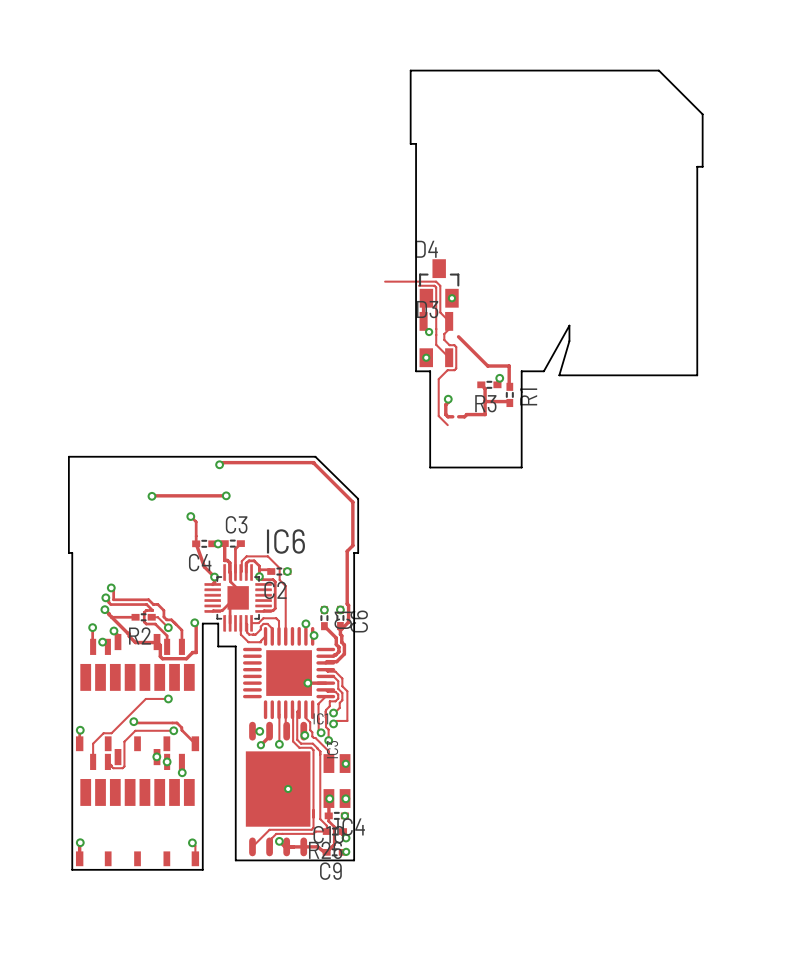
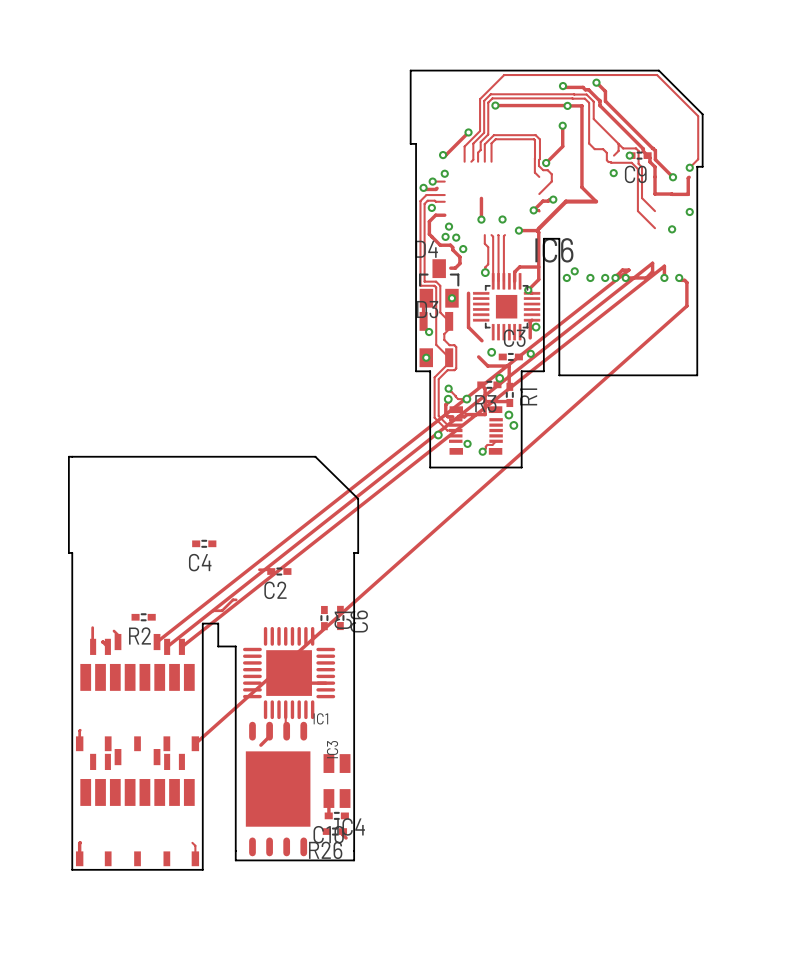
track: none -> (596, 82) (605, 91) (605, 101) (655, 150) (655, 159) (673, 177)
via: none -> (596, 82)
track: none -> (563, 86) (583, 87) (588, 89) (599, 101)
via: none -> (563, 86)
track: none -> (599, 100) (599, 105) (649, 157) (649, 161) (655, 166) (655, 194) (688, 194) (689, 177)
track: none -> (495, 105) (581, 105) (581, 187) (596, 201) (565, 201) (536, 230)
via: none -> (495, 105)
via: none -> (567, 105)
track: none -> (562, 125) (562, 146) (546, 163)
via: none -> (562, 125)
track: none -> (468, 132) (445, 155) (443, 155)
via: none -> (468, 132)
track: none -> (618, 143) (618, 151) (613, 155)
via: none -> (443, 155)
via: none -> (629, 155)
track: none -> (534, 158) (533, 139) (495, 139) (491, 143) (491, 161)
track: none -> (534, 158) (534, 172) (539, 176)
track: none -> (464, 161) (464, 146) (480, 131) (480, 99) (504, 75) (657, 75) (698, 116) (698, 159) (689, 167)
track: none -> (471, 161) (473, 159) (473, 143) (484, 132) (484, 100) (490, 94) (586, 94) (593, 101) (593, 119) (623, 148) (636, 148) (638, 150) (638, 163) (642, 167) (642, 198) (655, 211)
track: none -> (478, 161) (480, 142) (488, 134) (488, 102) (492, 98) (584, 98) (589, 102) (589, 143) (594, 149) (603, 149) (606, 152) (608, 162) (631, 162) (637, 169) (637, 211) (655, 228)
track: none -> (484, 161) (484, 144) (493, 135) (535, 135) (539, 139) (538, 165) (551, 174) (551, 181) (539, 194)
via: none -> (546, 163)
via: none -> (689, 167)
via: none -> (444, 173)
via: none -> (613, 173)
via: none -> (673, 177)
track: none -> (432, 181) (444, 181)
via: none -> (432, 181)
track: none -> (423, 187) (425, 189) (437, 188)
via: none -> (423, 187)
track: none -> (481, 198) (481, 219)
track: none -> (553, 199) (542, 201) (533, 210) (539, 211)
via: none -> (553, 199)
via: none -> (431, 207)
via: none -> (533, 210)
via: none -> (689, 211)
track: none -> (444, 215) (435, 215) (429, 221) (429, 234) (440, 245) (450, 245) (459, 257) (459, 263) (455, 268) (450, 268)
via: none -> (481, 219)
via: none -> (502, 219)
via: none -> (449, 226)
via: none -> (672, 229)
track: none -> (518, 230) (536, 230)
via: none -> (518, 230)
track: none -> (536, 230) (538, 232) (538, 279) (528, 290) (532, 293)
track: none -> (484, 235) (484, 243) (488, 247) (488, 264) (485, 267) (485, 272)
track: none -> (491, 235) (493, 236) (493, 281)
track: none -> (498, 235) (498, 281)
track: none -> (504, 235) (503, 281)
via: none -> (445, 236)
via: none -> (456, 237)
via: none -> (463, 249)
track: none -> (538, 267) (519, 267) (514, 272) (514, 281)
via: none -> (574, 271)
via: none -> (485, 272)
via: none -> (566, 277)
via: none -> (590, 277)
via: none -> (605, 277)
via: none -> (615, 277)
via: none -> (625, 277)
via: none -> (664, 277)
via: none -> (679, 277)
track: (385, 281) (424, 281) -> (444, 201) (427, 200) (424, 203) (424, 281)
track: (419, 285) (420, 285) -> (444, 195) (426, 195) (420, 201) (420, 285)
via: none -> (528, 290)
track: none -> (468, 293) (468, 327) (481, 340)
track: none -> (532, 320) (530, 321) (530, 337)
via: none -> (536, 327)
track: (458, 336) (478, 356) -> none
via: none -> (491, 352)
via: none -> (530, 353)
track: none -> (449, 357) (449, 362) (434, 377) (434, 417) (447, 430) (455, 430)
board edge: (543, 371) (569, 325) (569, 341) (559, 375) -> (543, 371) (543, 238) (559, 238) (559, 375)
track: none -> (448, 388) (458, 399) (466, 399)
via: none -> (448, 388)
via: none -> (466, 399)
via: none -> (508, 415)
via: none -> (513, 425)
part: none -> (475, 430)
via: none -> (438, 435)
track: none -> (496, 441) (492, 444) (487, 444) (482, 451)
via: none -> (467, 443)
via: none -> (482, 451)
track: (219, 464) (223, 462) (313, 462) (352, 502) (352, 545) (347, 551) (348, 622) (340, 630) -> none
via: (219, 464) -> none
track: (226, 495) (151, 496) -> none
via: (226, 495) -> none
via: (151, 496) -> none
track: (190, 516) (196, 521) (196, 543) (204, 566) (214, 577) (212, 584) -> none
via: (190, 516) -> none
track: (218, 543) (224, 543) (224, 560) (229, 562) (230, 581) (238, 589) (238, 597) (230, 605) (230, 623) -> none
via: (218, 543) -> none
C3 position: (232, 543) -> (510, 356)
track: (240, 543) (235, 548) (235, 572) -> none
via: (287, 571) -> none
track: (240, 572) (241, 561) (246, 556) (267, 556) (279, 568) (279, 580) (285, 586) (285, 636) -> none
track: (246, 572) (246, 563) (254, 560) (259, 566) (259, 576) (262, 579) (273, 579) (275, 581) (275, 608) (273, 610) (263, 611) -> none
via: (259, 576) -> none
via: (214, 577) -> none
track: (111, 587) (113, 590) (113, 599) (148, 599) (153, 604) (157, 604) (163, 610) (163, 616) (166, 619) (171, 619) (181, 630) (181, 646) -> (664, 277) (664, 266) (181, 646)
via: (111, 587) -> none
track: (105, 597) (110, 604) (146, 604) (152, 610) (144, 612) (144, 622) (146, 624) (155, 624) (167, 635) (167, 646) -> (625, 277) (646, 277) (652, 271) (652, 263) (167, 646)
via: (105, 597) -> none
IC6 position: (238, 597) -> (506, 306)
track: (104, 609) (135, 642) (156, 642) -> none
via: (104, 609) -> none
via: (340, 609) -> none
via: (324, 610) -> none
track: (111, 617) (135, 617) -> none
track: (151, 617) (157, 617) (168, 627) -> none
track: (194, 622) (196, 652) (192, 652) (186, 658) (162, 658) (160, 656) (160, 645) (157, 642) -> (615, 277) (622, 270) (628, 270) (157, 642)
via: (194, 622) -> none
track: (240, 623) (240, 634) (248, 642) (261, 642) (265, 636) -> none
track: (246, 623) (249, 634) (255, 634) (263, 623) (267, 623) (272, 628) (272, 636) -> none
track: (251, 623) (258, 623) (263, 618) (276, 618) (279, 621) (279, 636) -> none
via: (305, 623) -> none
track: (324, 626) (336, 638) (338, 651) (333, 656) -> none
track: (340, 626) (344, 654) (336, 661) (325, 662) -> none
via: (92, 627) -> none
via: (168, 627) -> none
via: (113, 631) -> none
via: (314, 635) -> none
via: (102, 642) -> none
track: (325, 669) (327, 671) (335, 671) (342, 678) (342, 686) (347, 691) (347, 720) (336, 720) (333, 723) -> none
track: (325, 676) (333, 676) (338, 681) (338, 688) (342, 692) (339, 707) (333, 713) -> none
via: (307, 683) -> none
track: (325, 689) (327, 691) (335, 691) (338, 694) (338, 698) (335, 701) (329, 701) (329, 706) (325, 711) (326, 717) -> none
track: (325, 696) (318, 703) (318, 718) -> none
track: (168, 698) (145, 698) (111, 733) (103, 733) (93, 743) (93, 761) -> none
via: (168, 698) -> none
track: (279, 709) (279, 744) -> none
track: (292, 709) (293, 741) (299, 747) (311, 747) (313, 750) (313, 827) (311, 829) (269, 829) (252, 846) -> none
track: (299, 709) (297, 711) (297, 739) (301, 743) (312, 743) (320, 751) (320, 819) (326, 825) (326, 831) (315, 831) (313, 833) (276, 833) (271, 838) (271, 844) (269, 846) -> none
track: (305, 709) (305, 718) (310, 722) (312, 736) (328, 751) (328, 763) -> none
via: (333, 713) -> none
track: (325, 715) (328, 740) -> none
track: (318, 718) (318, 730) (321, 732) -> none
track: (133, 721) (177, 722) (195, 743) -> (679, 277) (686, 282) (686, 306) (195, 743)
via: (133, 721) -> none
via: (333, 723) -> none
via: (80, 730) -> none
track: (173, 730) (135, 730) (124, 741) (124, 766) (113, 768) (107, 761) -> none
via: (173, 730) -> none
via: (259, 731) -> none
via: (321, 732) -> none
via: (304, 735) -> none
via: (328, 740) -> none
via: (279, 744) -> none
via: (260, 745) -> none
via: (156, 756) -> none
via: (167, 761) -> none
via: (345, 763) -> none
via: (182, 772) -> none
via: (288, 788) -> none
via: (329, 798) -> none
via: (345, 798) -> none
track: (328, 815) (328, 821) (334, 826) (334, 844) (325, 853) (317, 846) (284, 846) (279, 841) -> none
via: (344, 815) -> none
via: (346, 838) -> none
via: (279, 841) -> none
via: (80, 842) -> none
via: (192, 842) -> none
via: (346, 851) -> none
C9 position: (334, 852) -> (639, 155)

